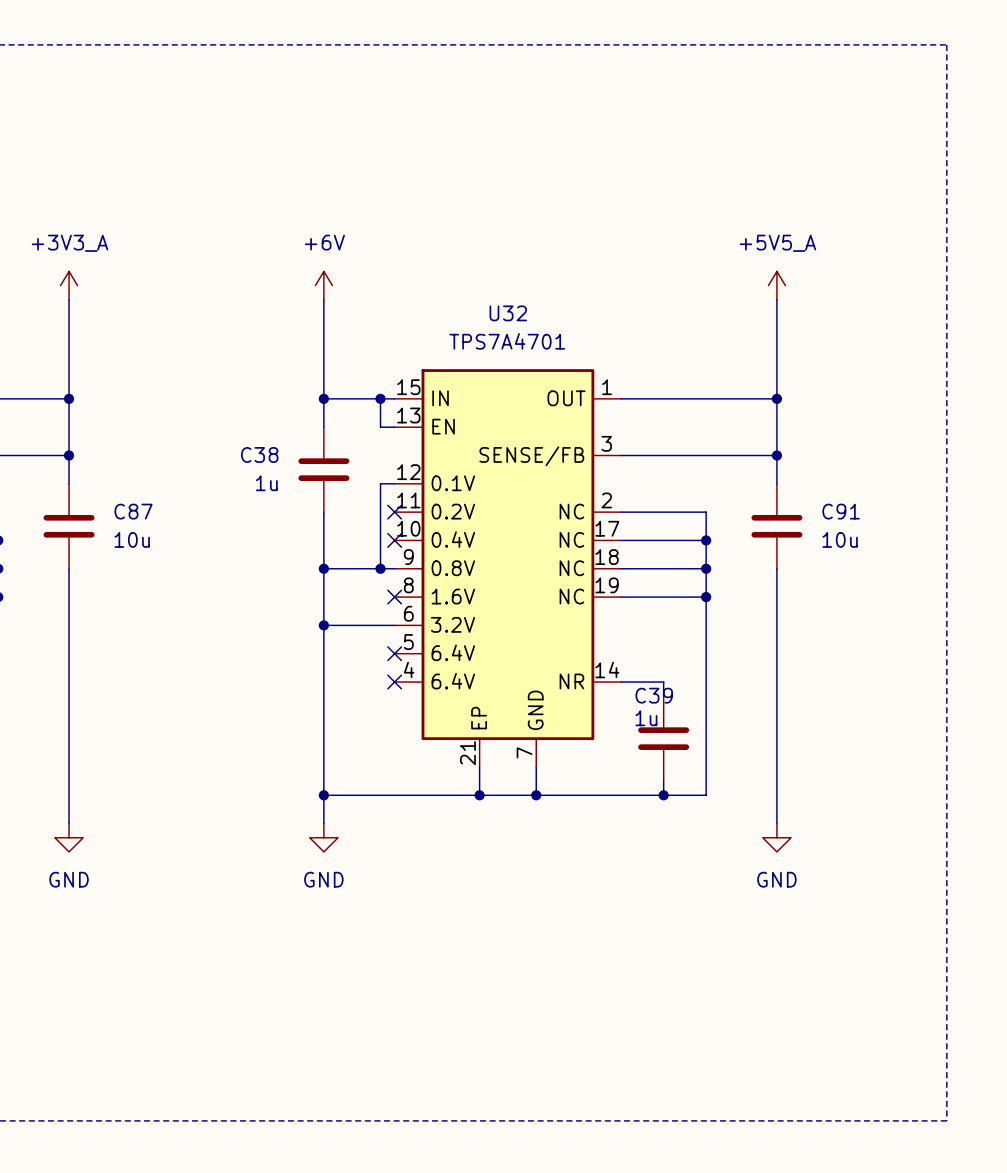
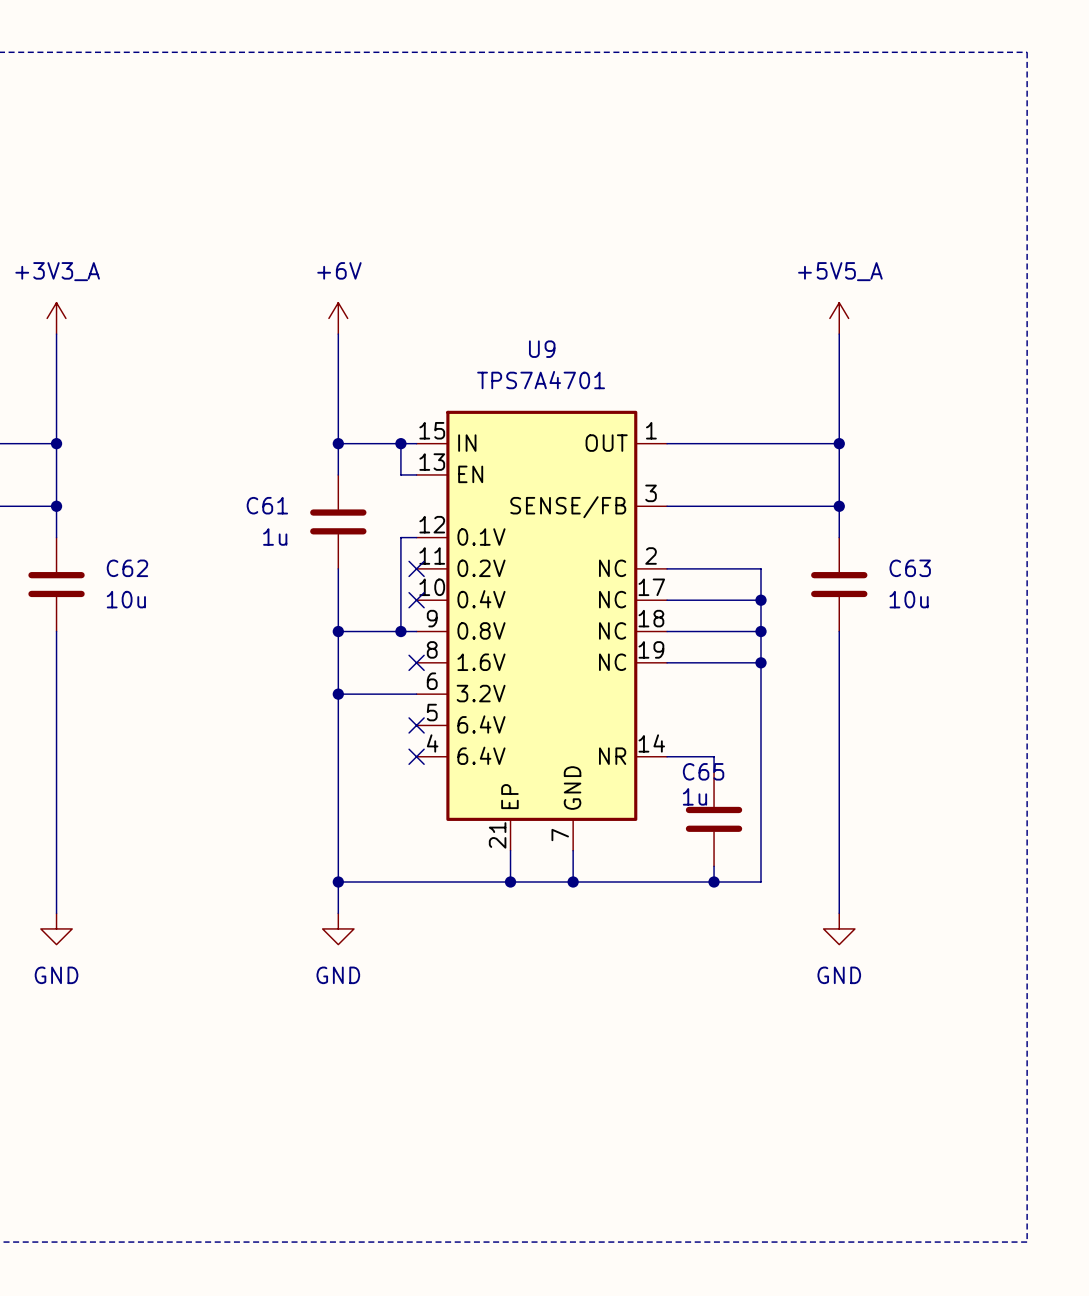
U32 name: U32 (508, 313) -> U9 (542, 349)
C38 name: C38 (259, 454) -> C61 (267, 505)
C87 name: C87 (133, 511) -> C62 (127, 568)
C91 name: C91 (841, 511) -> C63 (910, 568)
C39 name: C39 (654, 695) -> C65 (703, 771)

